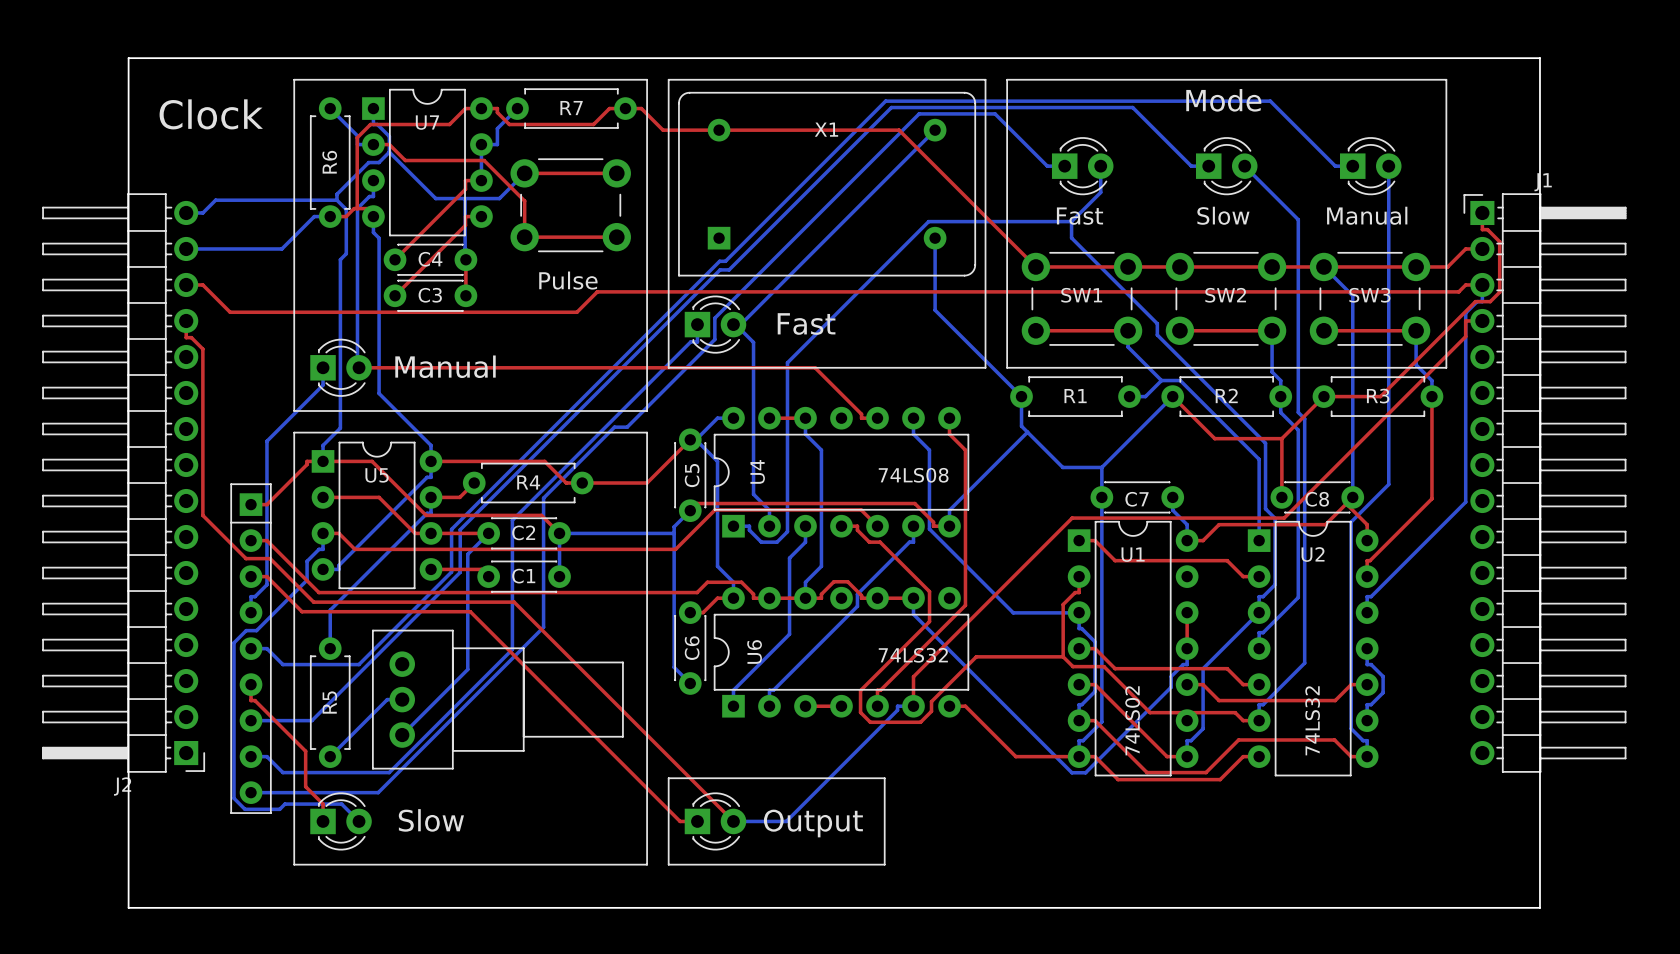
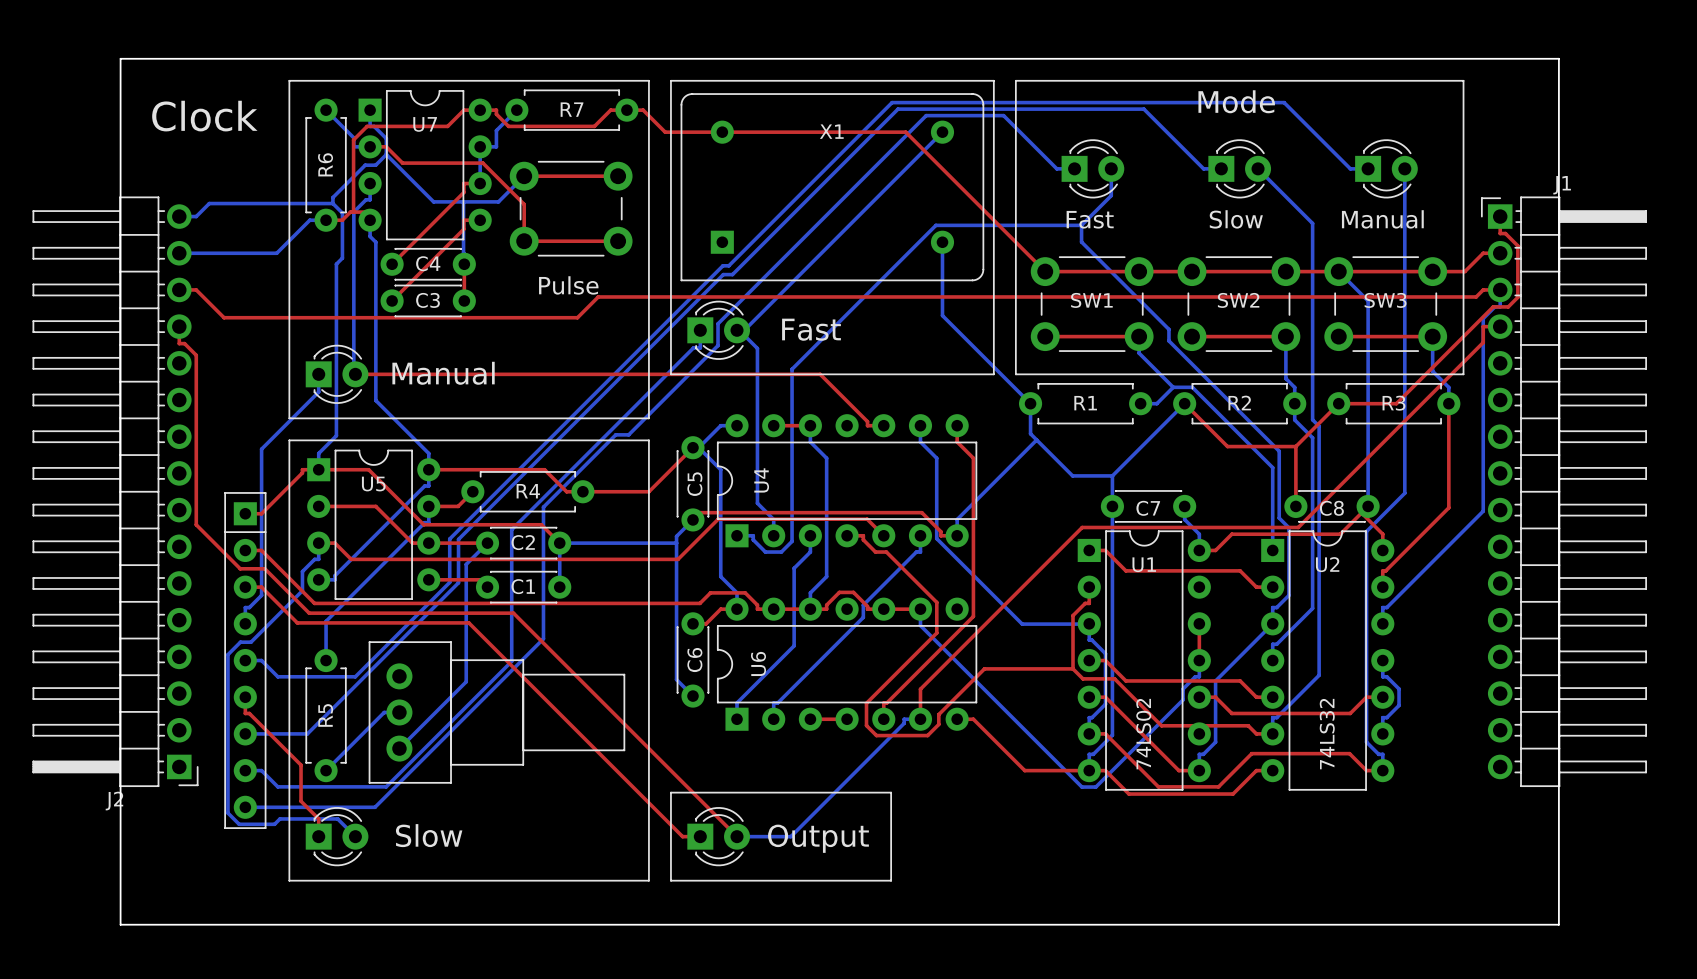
U4 value: 74LS08 (913, 475) -> none
U6 value: 74LS32 (913, 655) -> none

